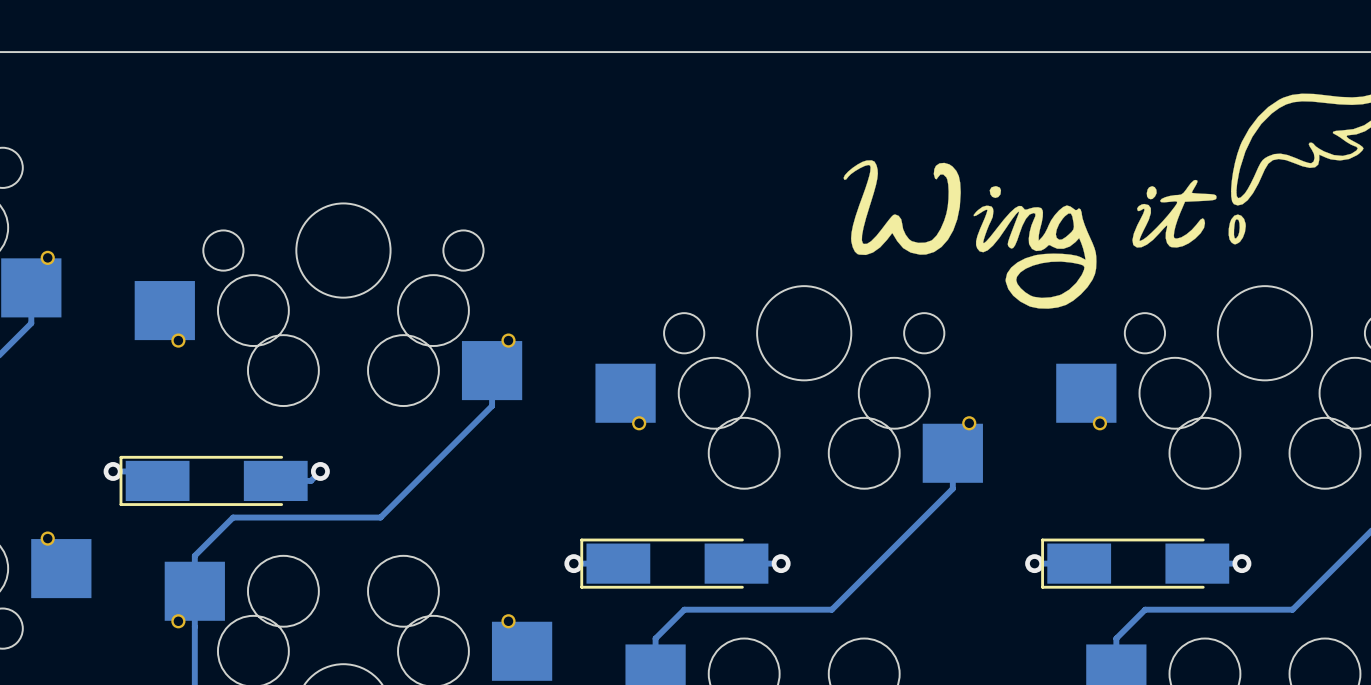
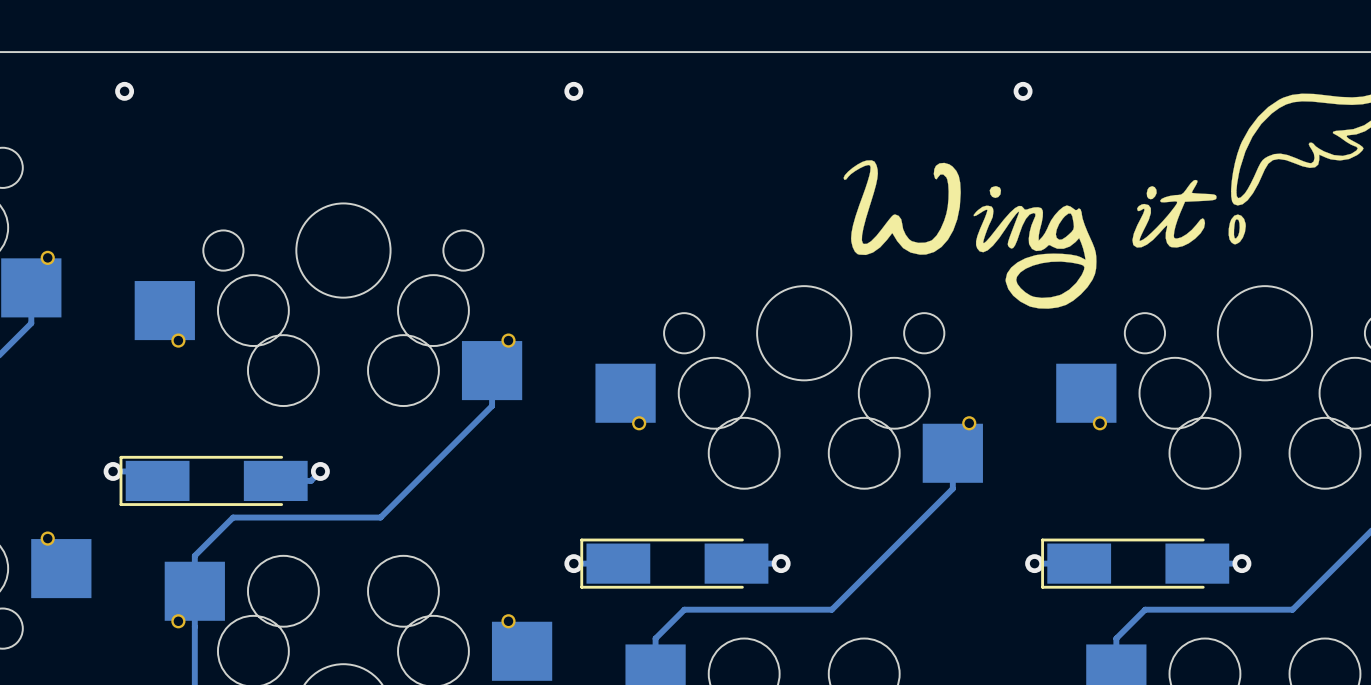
via: none -> (124, 91)
via: none -> (573, 91)
via: none -> (1023, 91)

